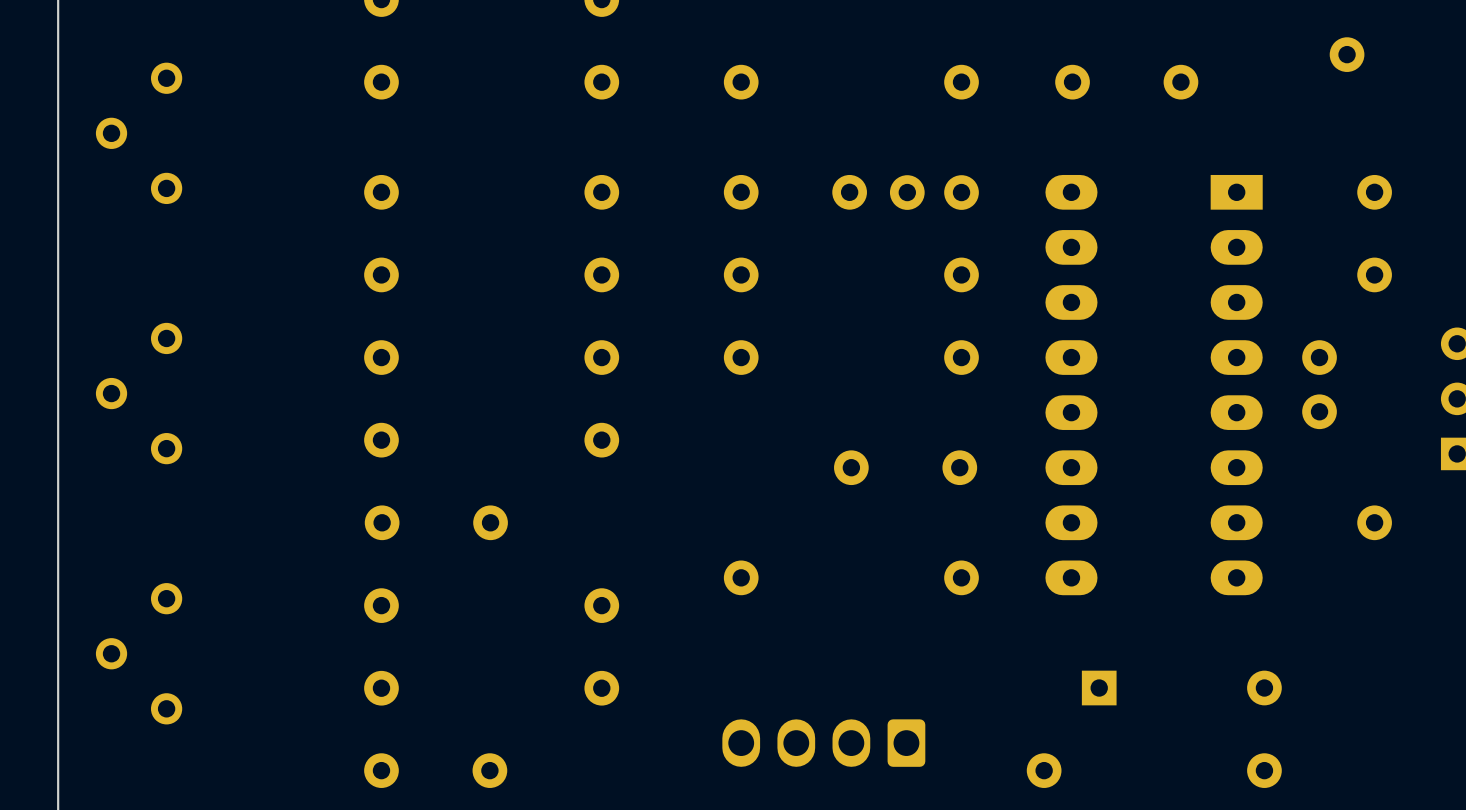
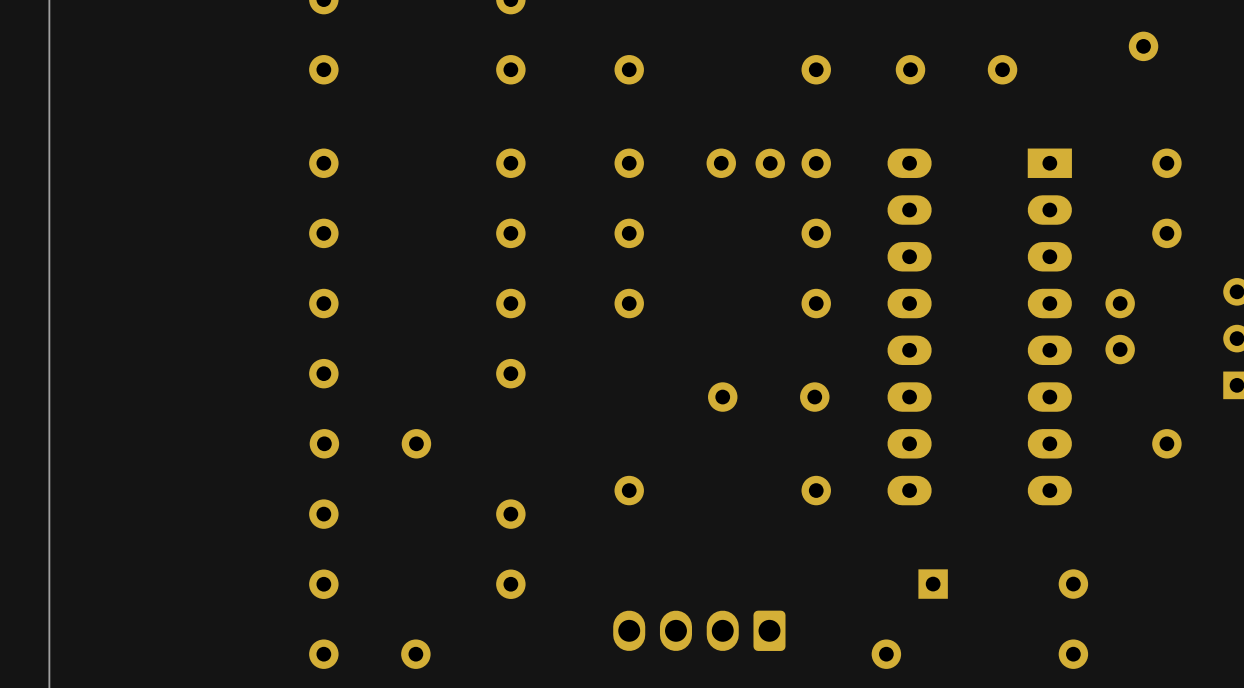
part: (139, 133) -> none
part: (139, 393) -> none
part: (139, 653) -> none

